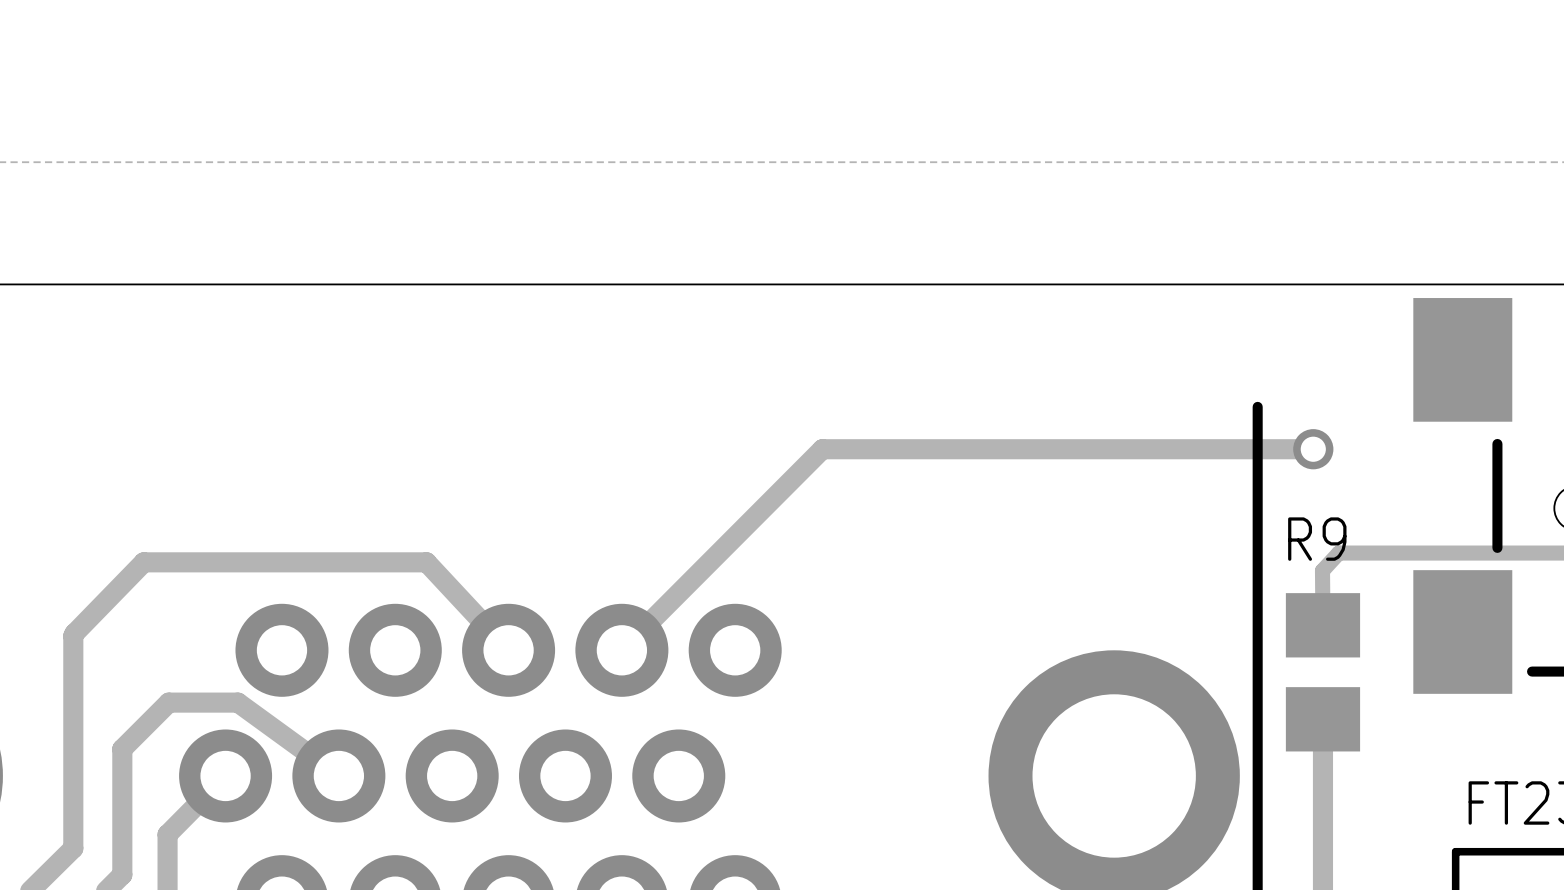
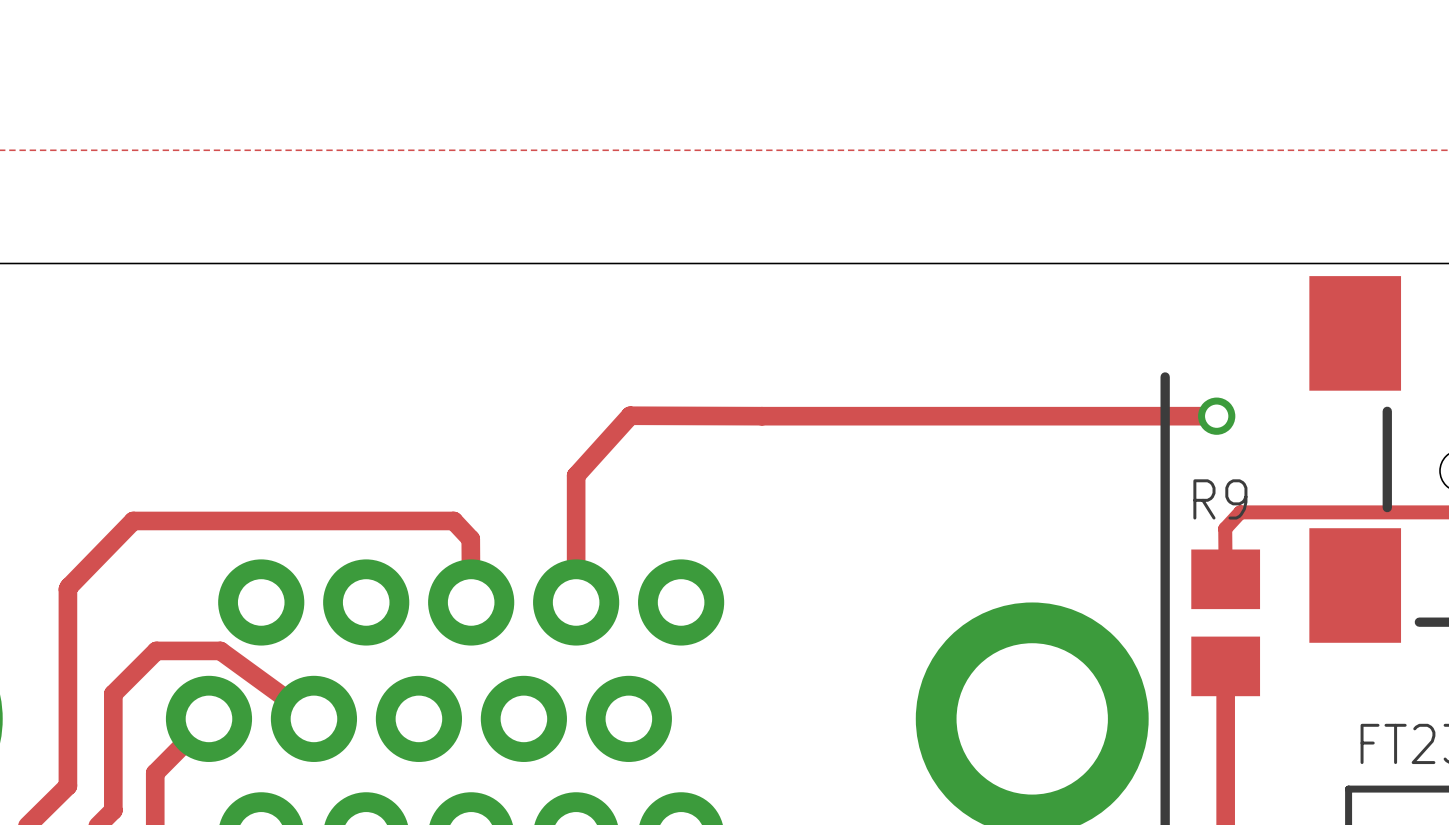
track: (822, 449) (621, 650) -> (761, 416) (630, 415) (576, 475) (576, 602)
track: (426, 562) (508, 650) -> (395, 520) (453, 520) (470, 539) (471, 602)

